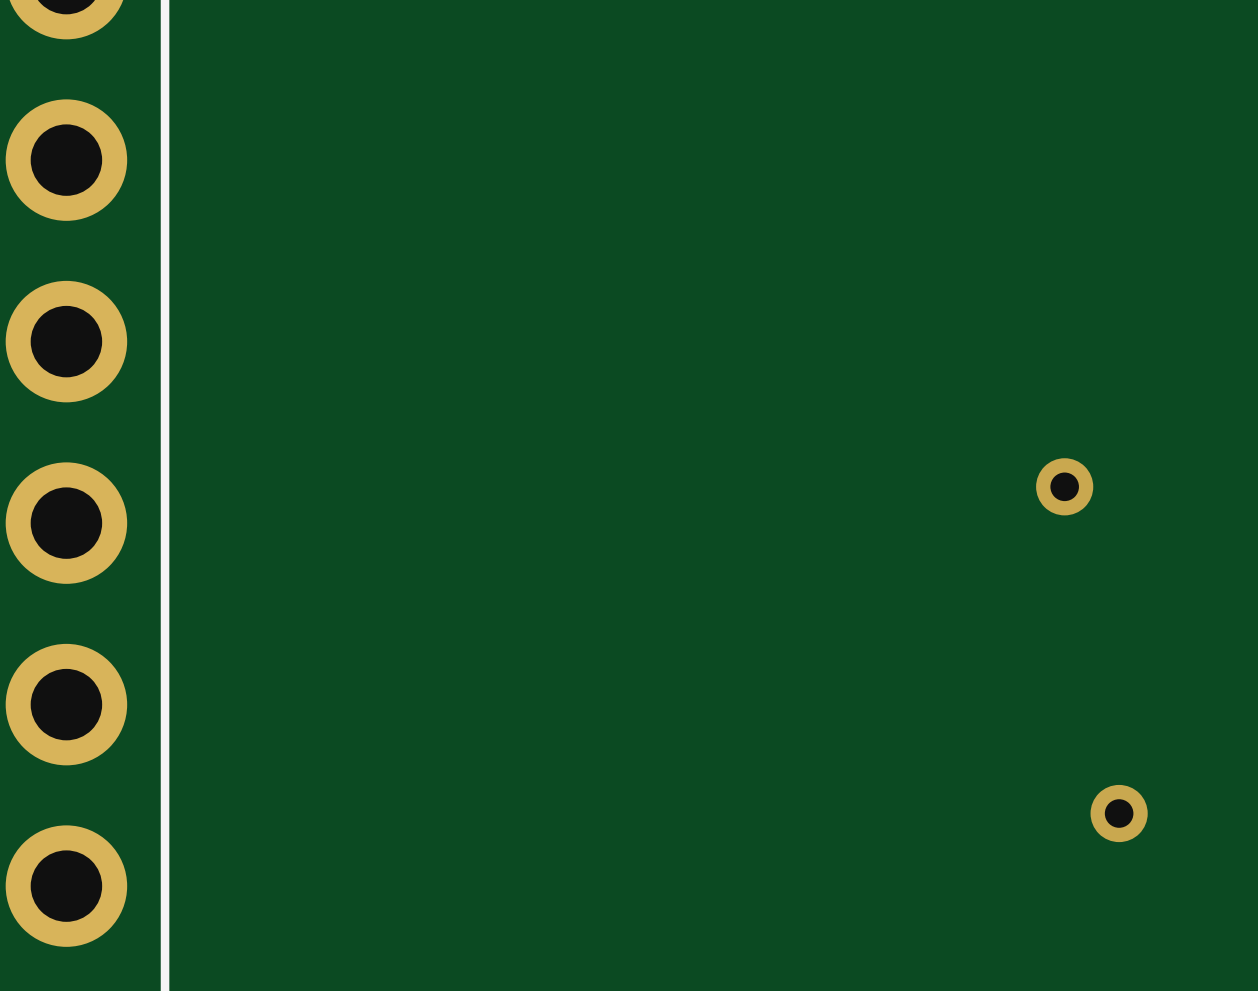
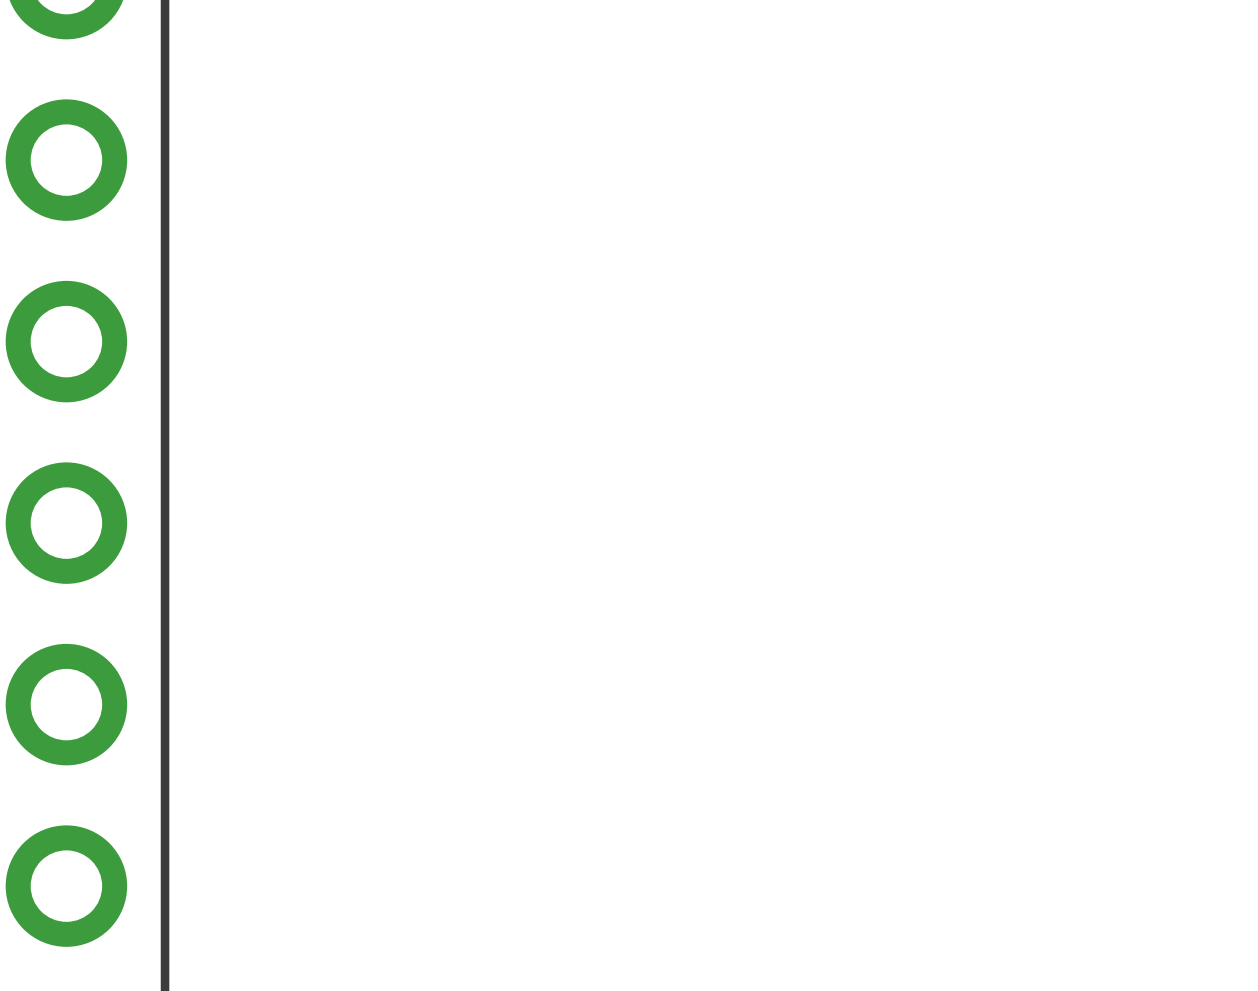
via: (1064, 486) -> none
via: (1119, 813) -> none

